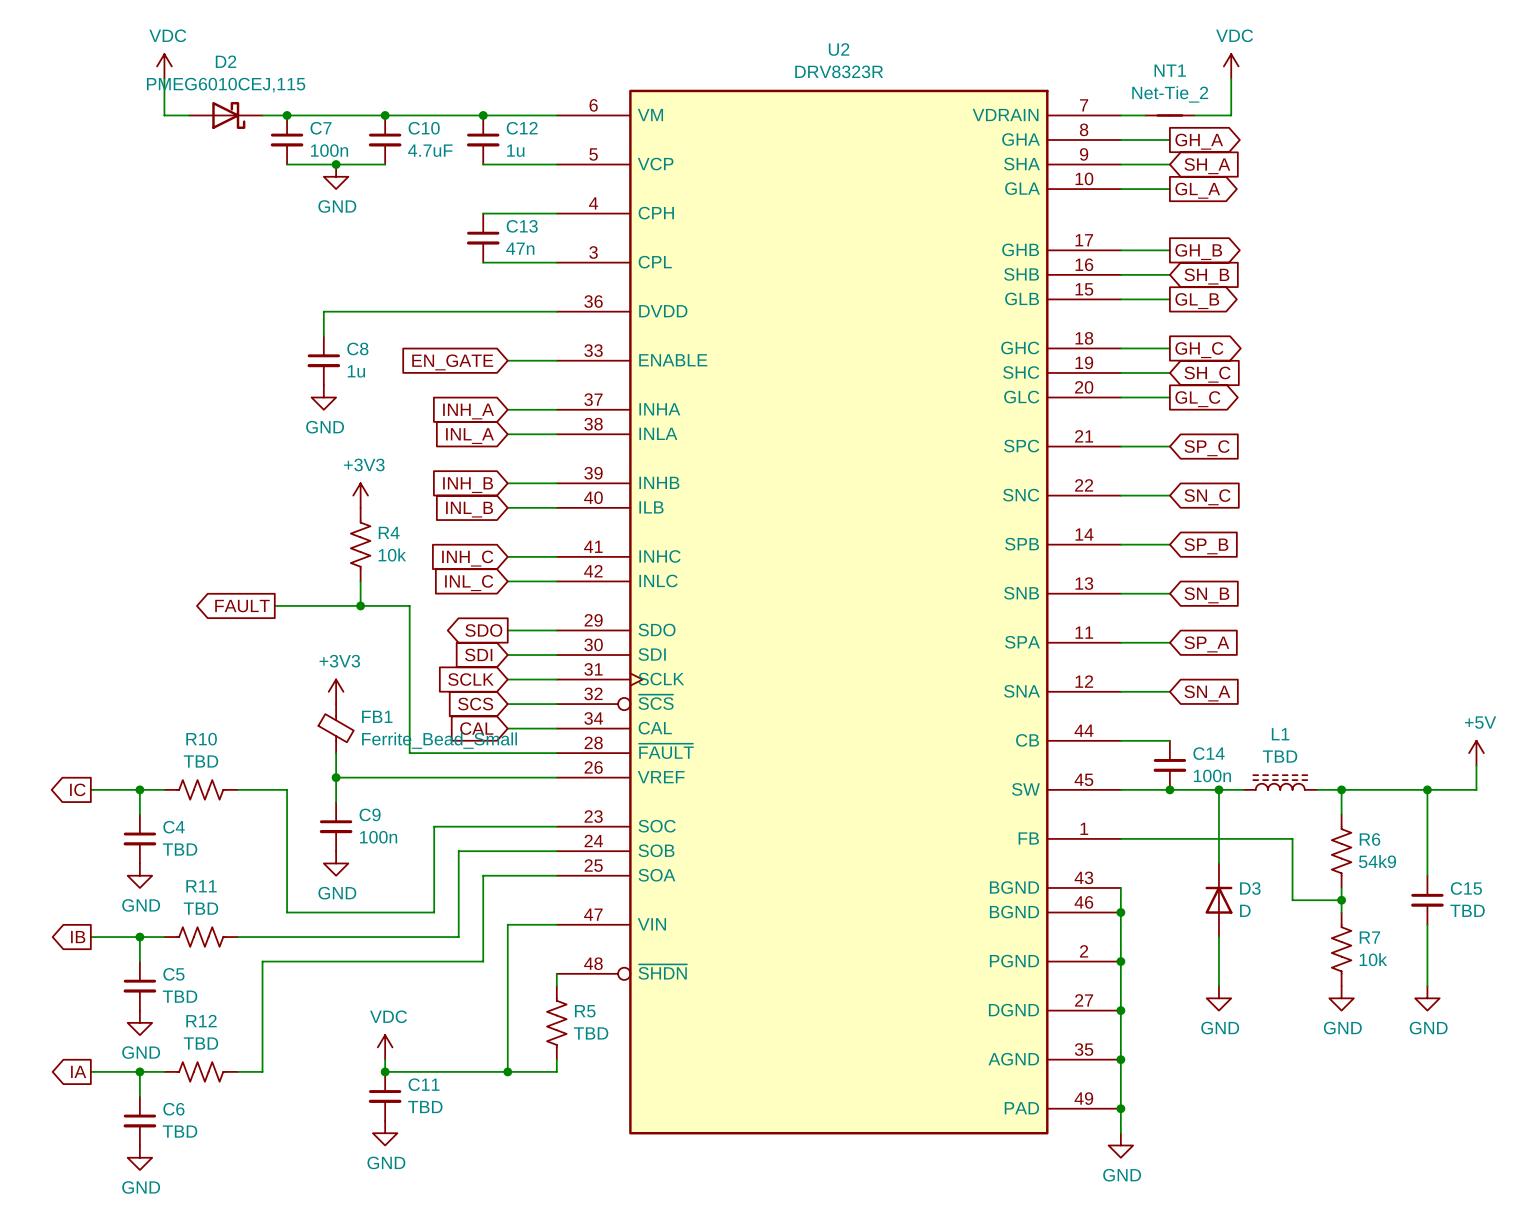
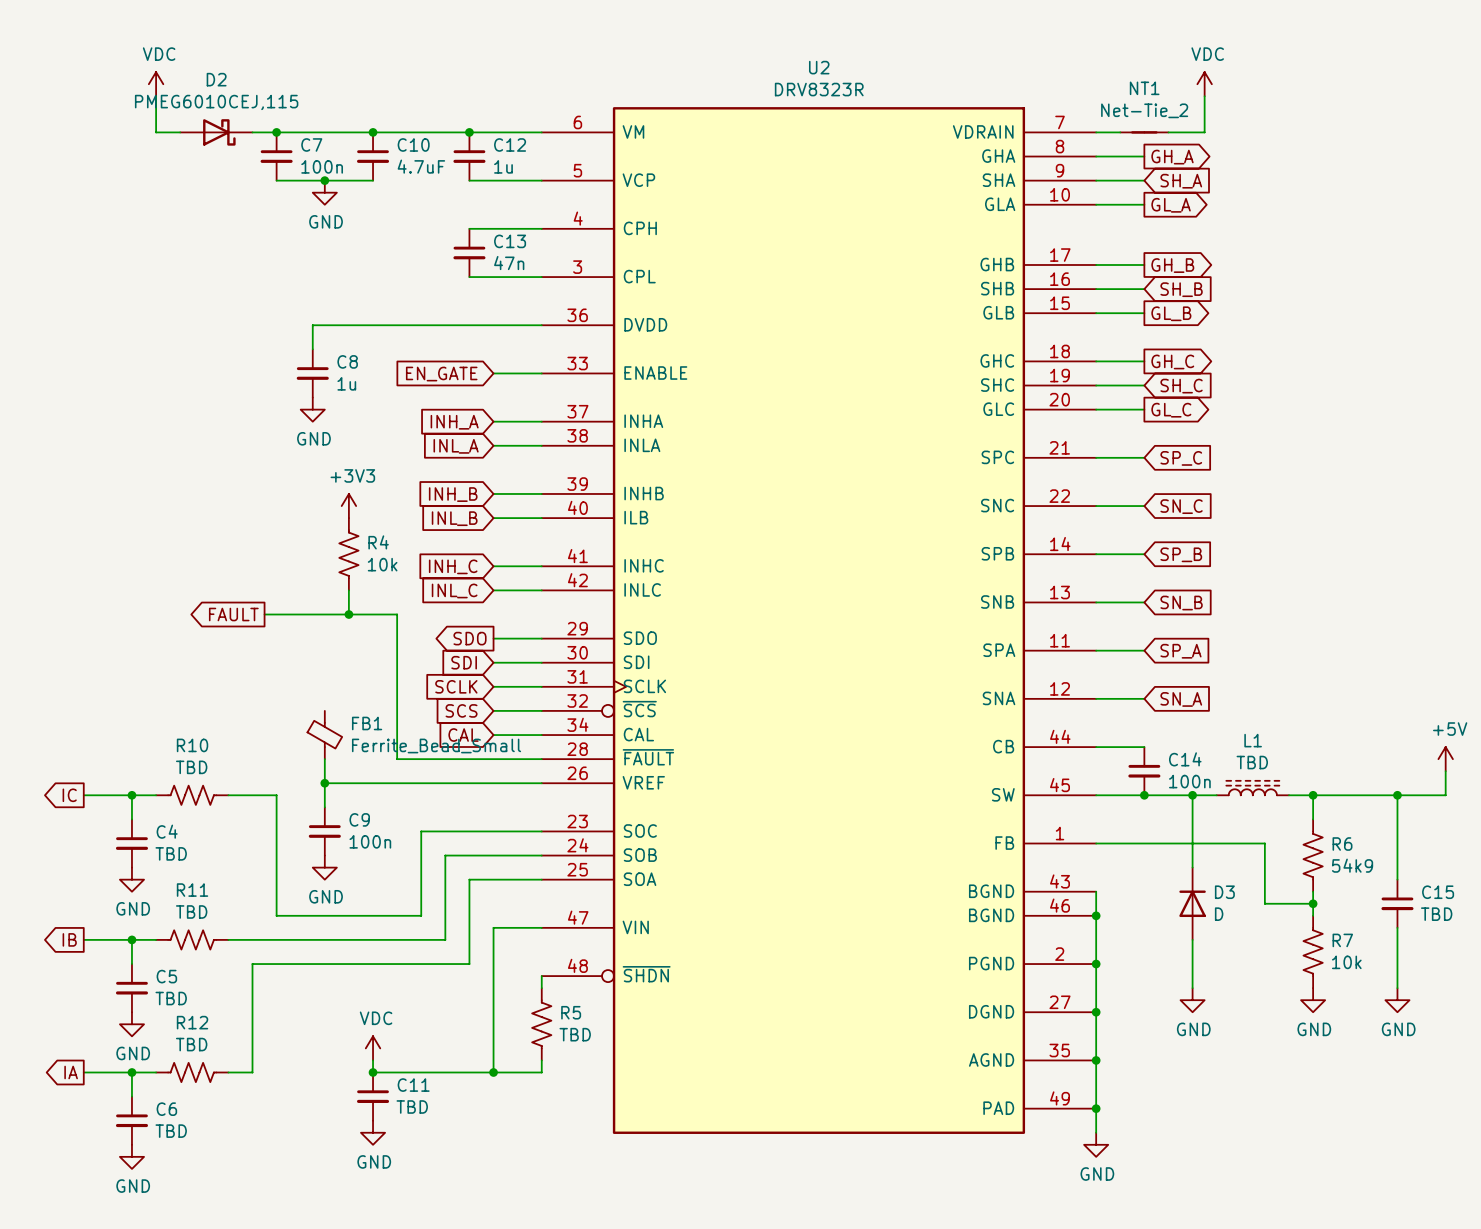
power symbol: +3V3 (336, 691) -> none

